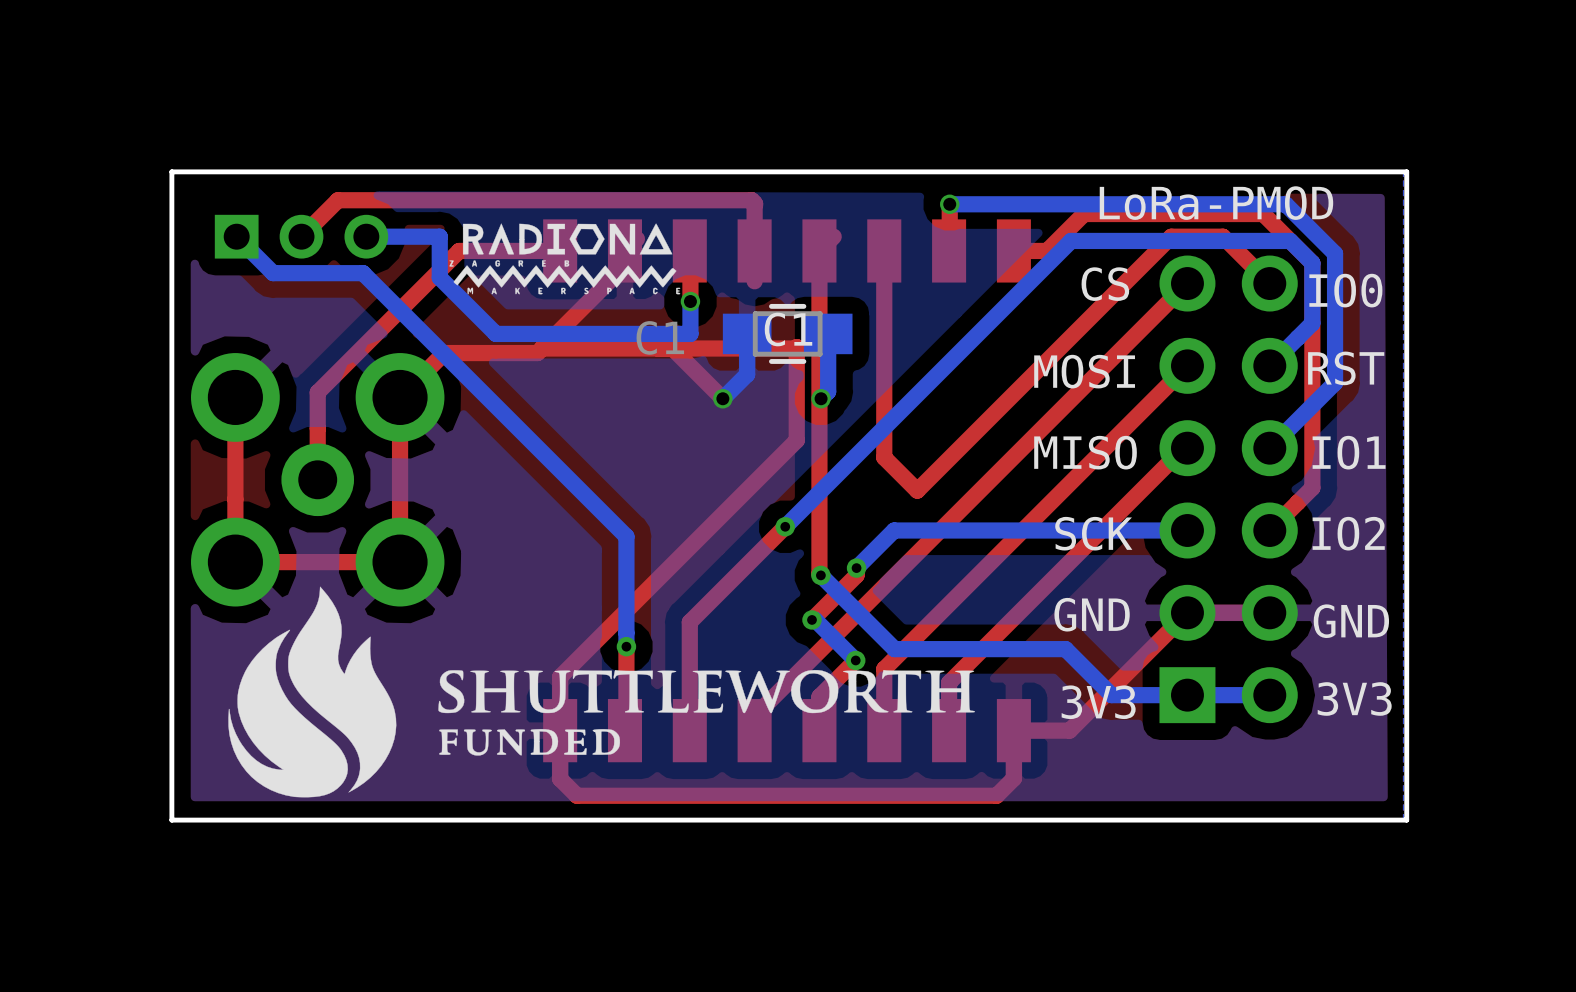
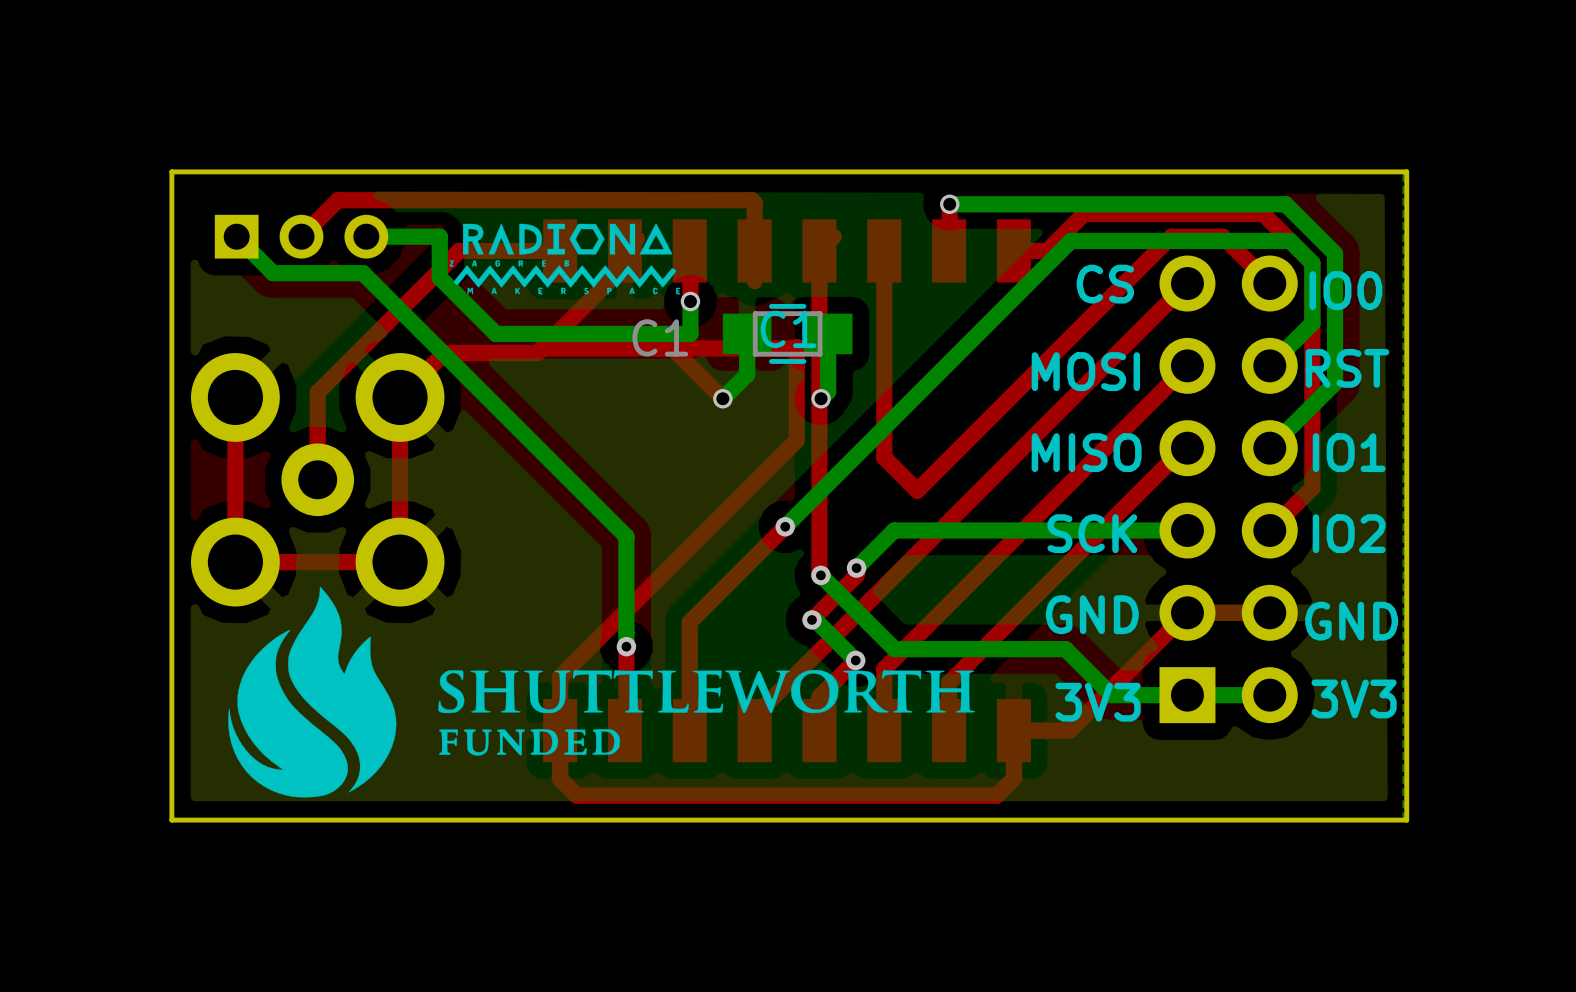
text: LoRa-PMOD (1216, 203) -> none

